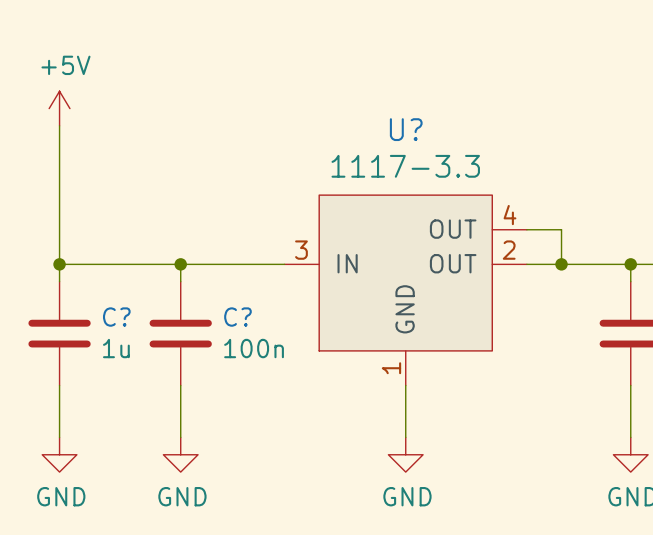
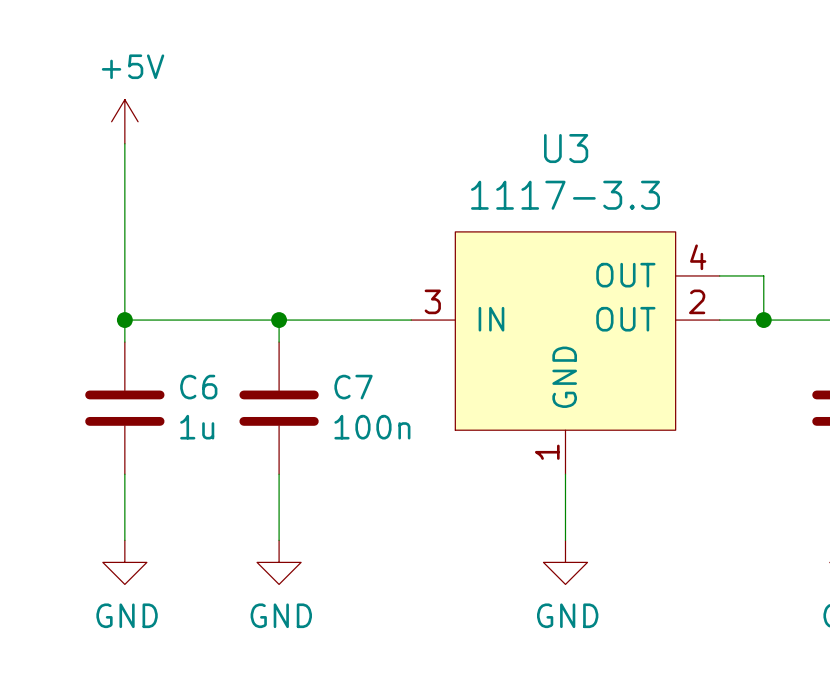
U? name: U? (406, 129) -> U3 (566, 148)
C? name: C? (116, 317) -> C6 (198, 387)
C? name: C? (237, 317) -> C7 (353, 387)

